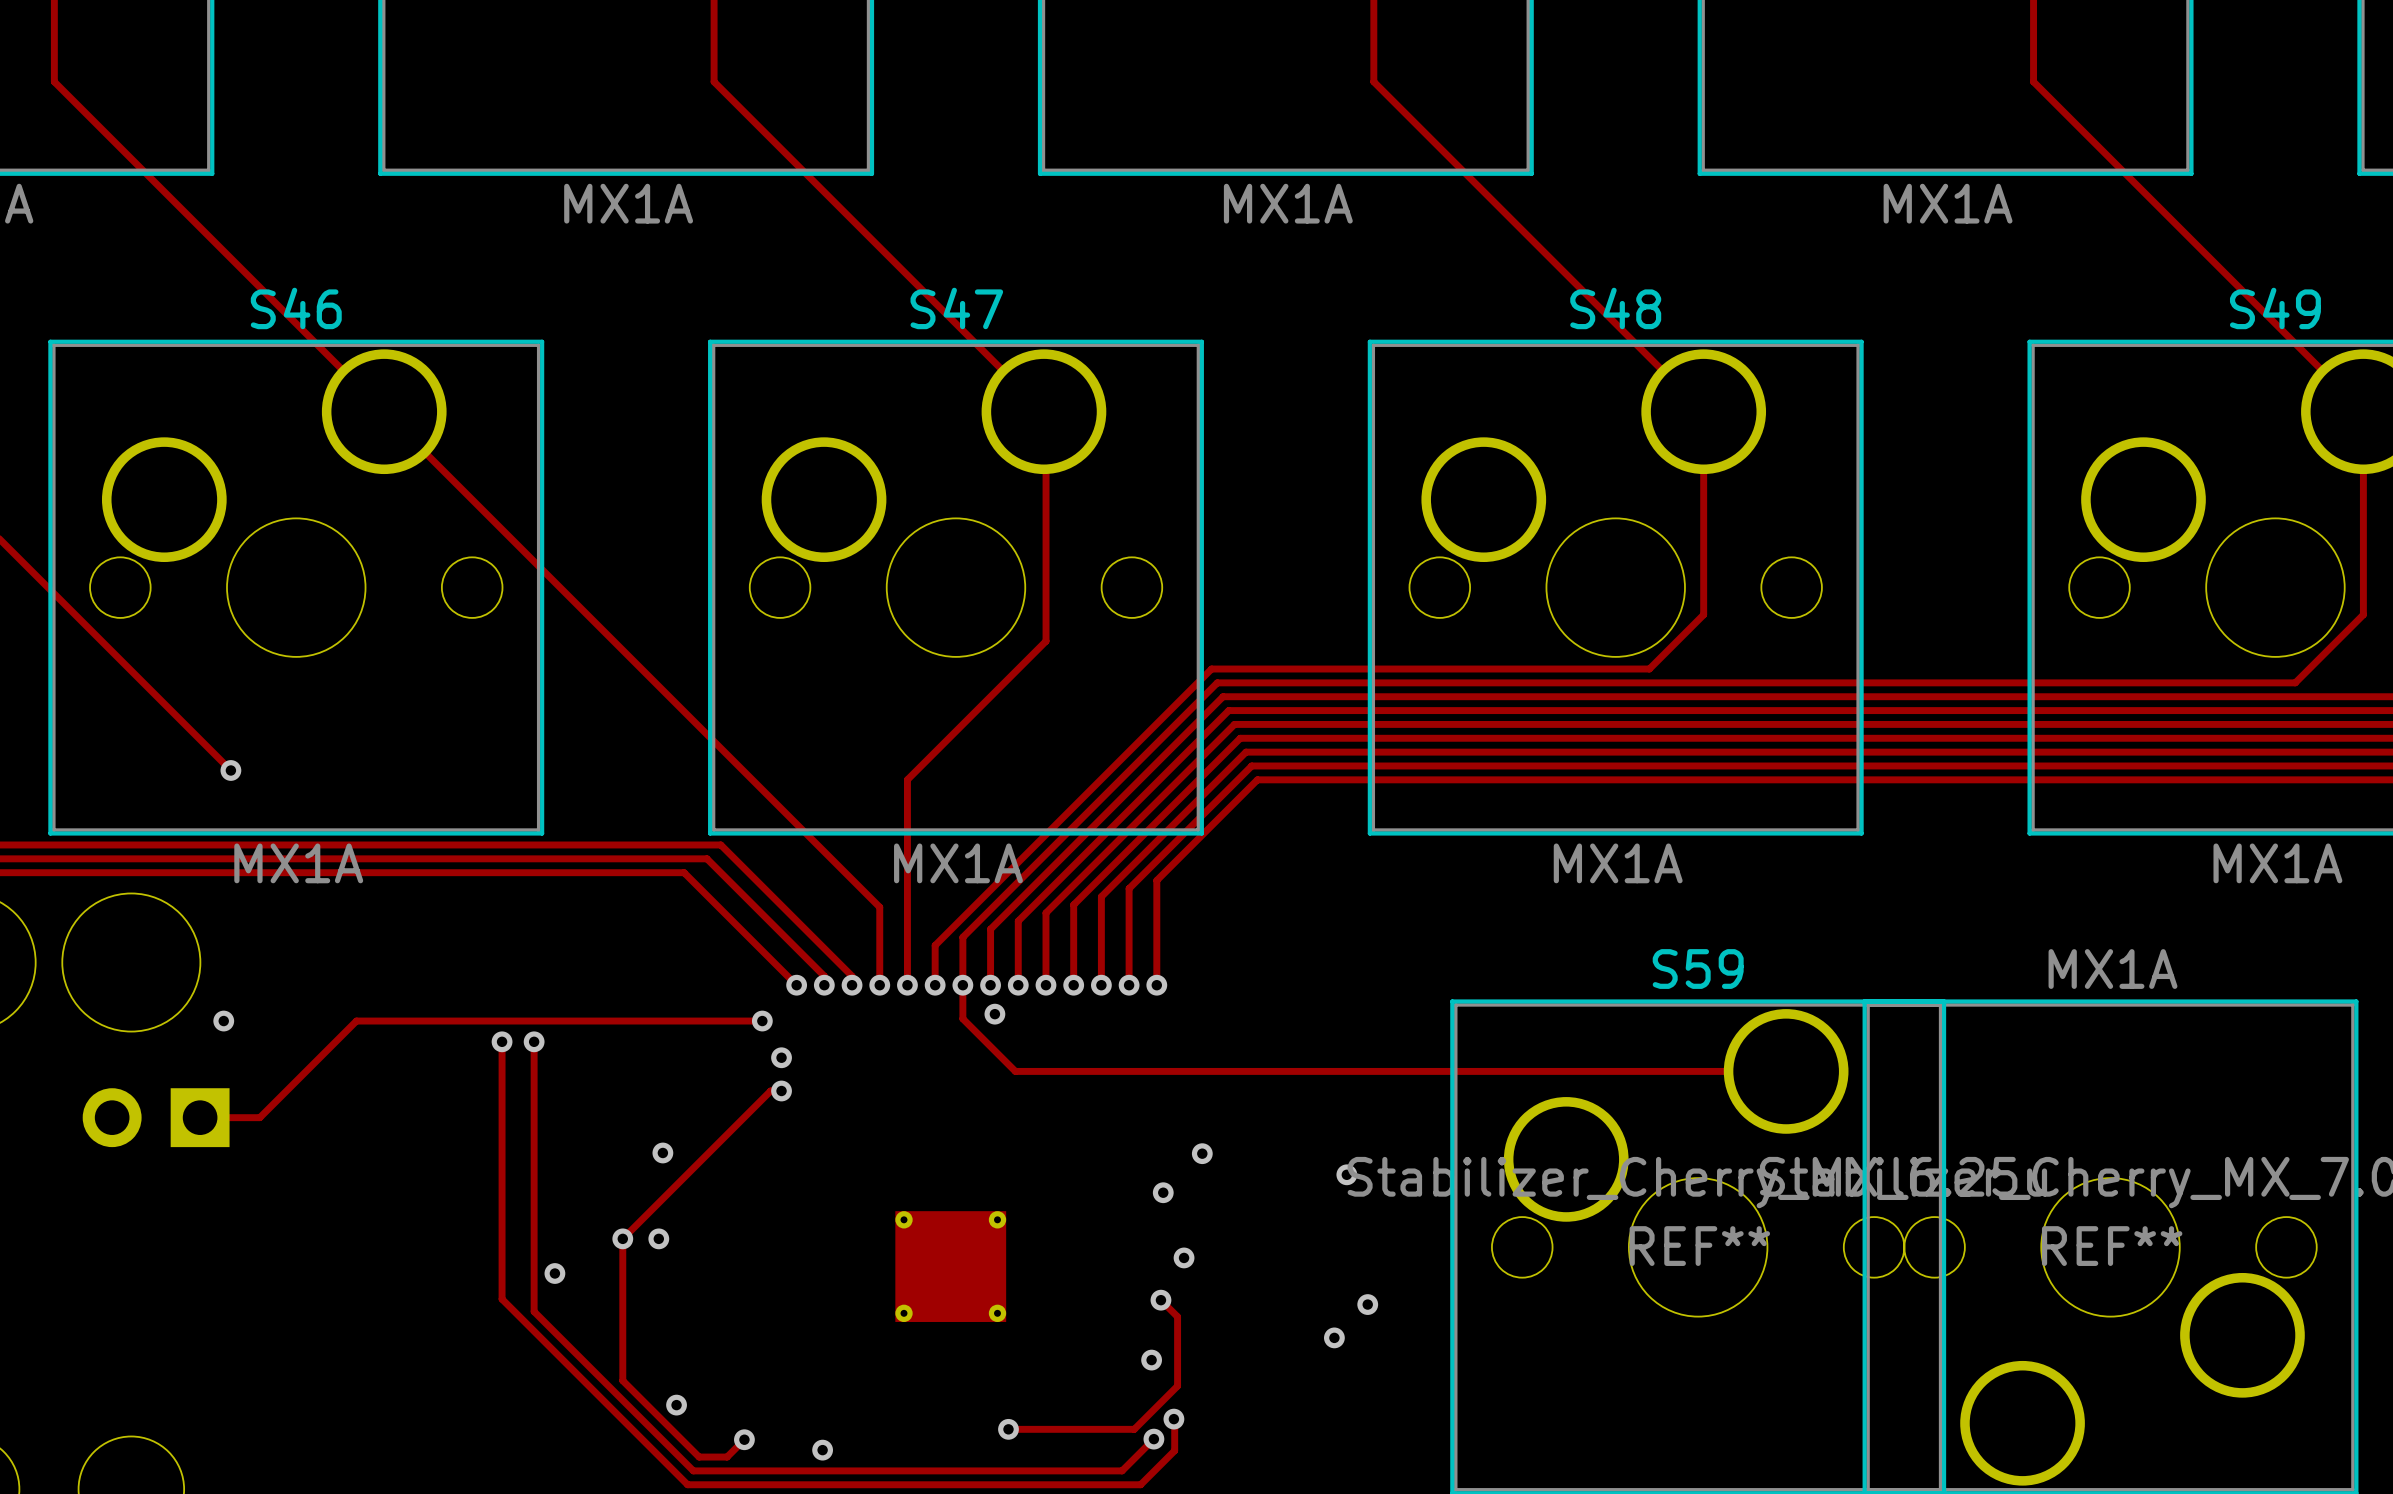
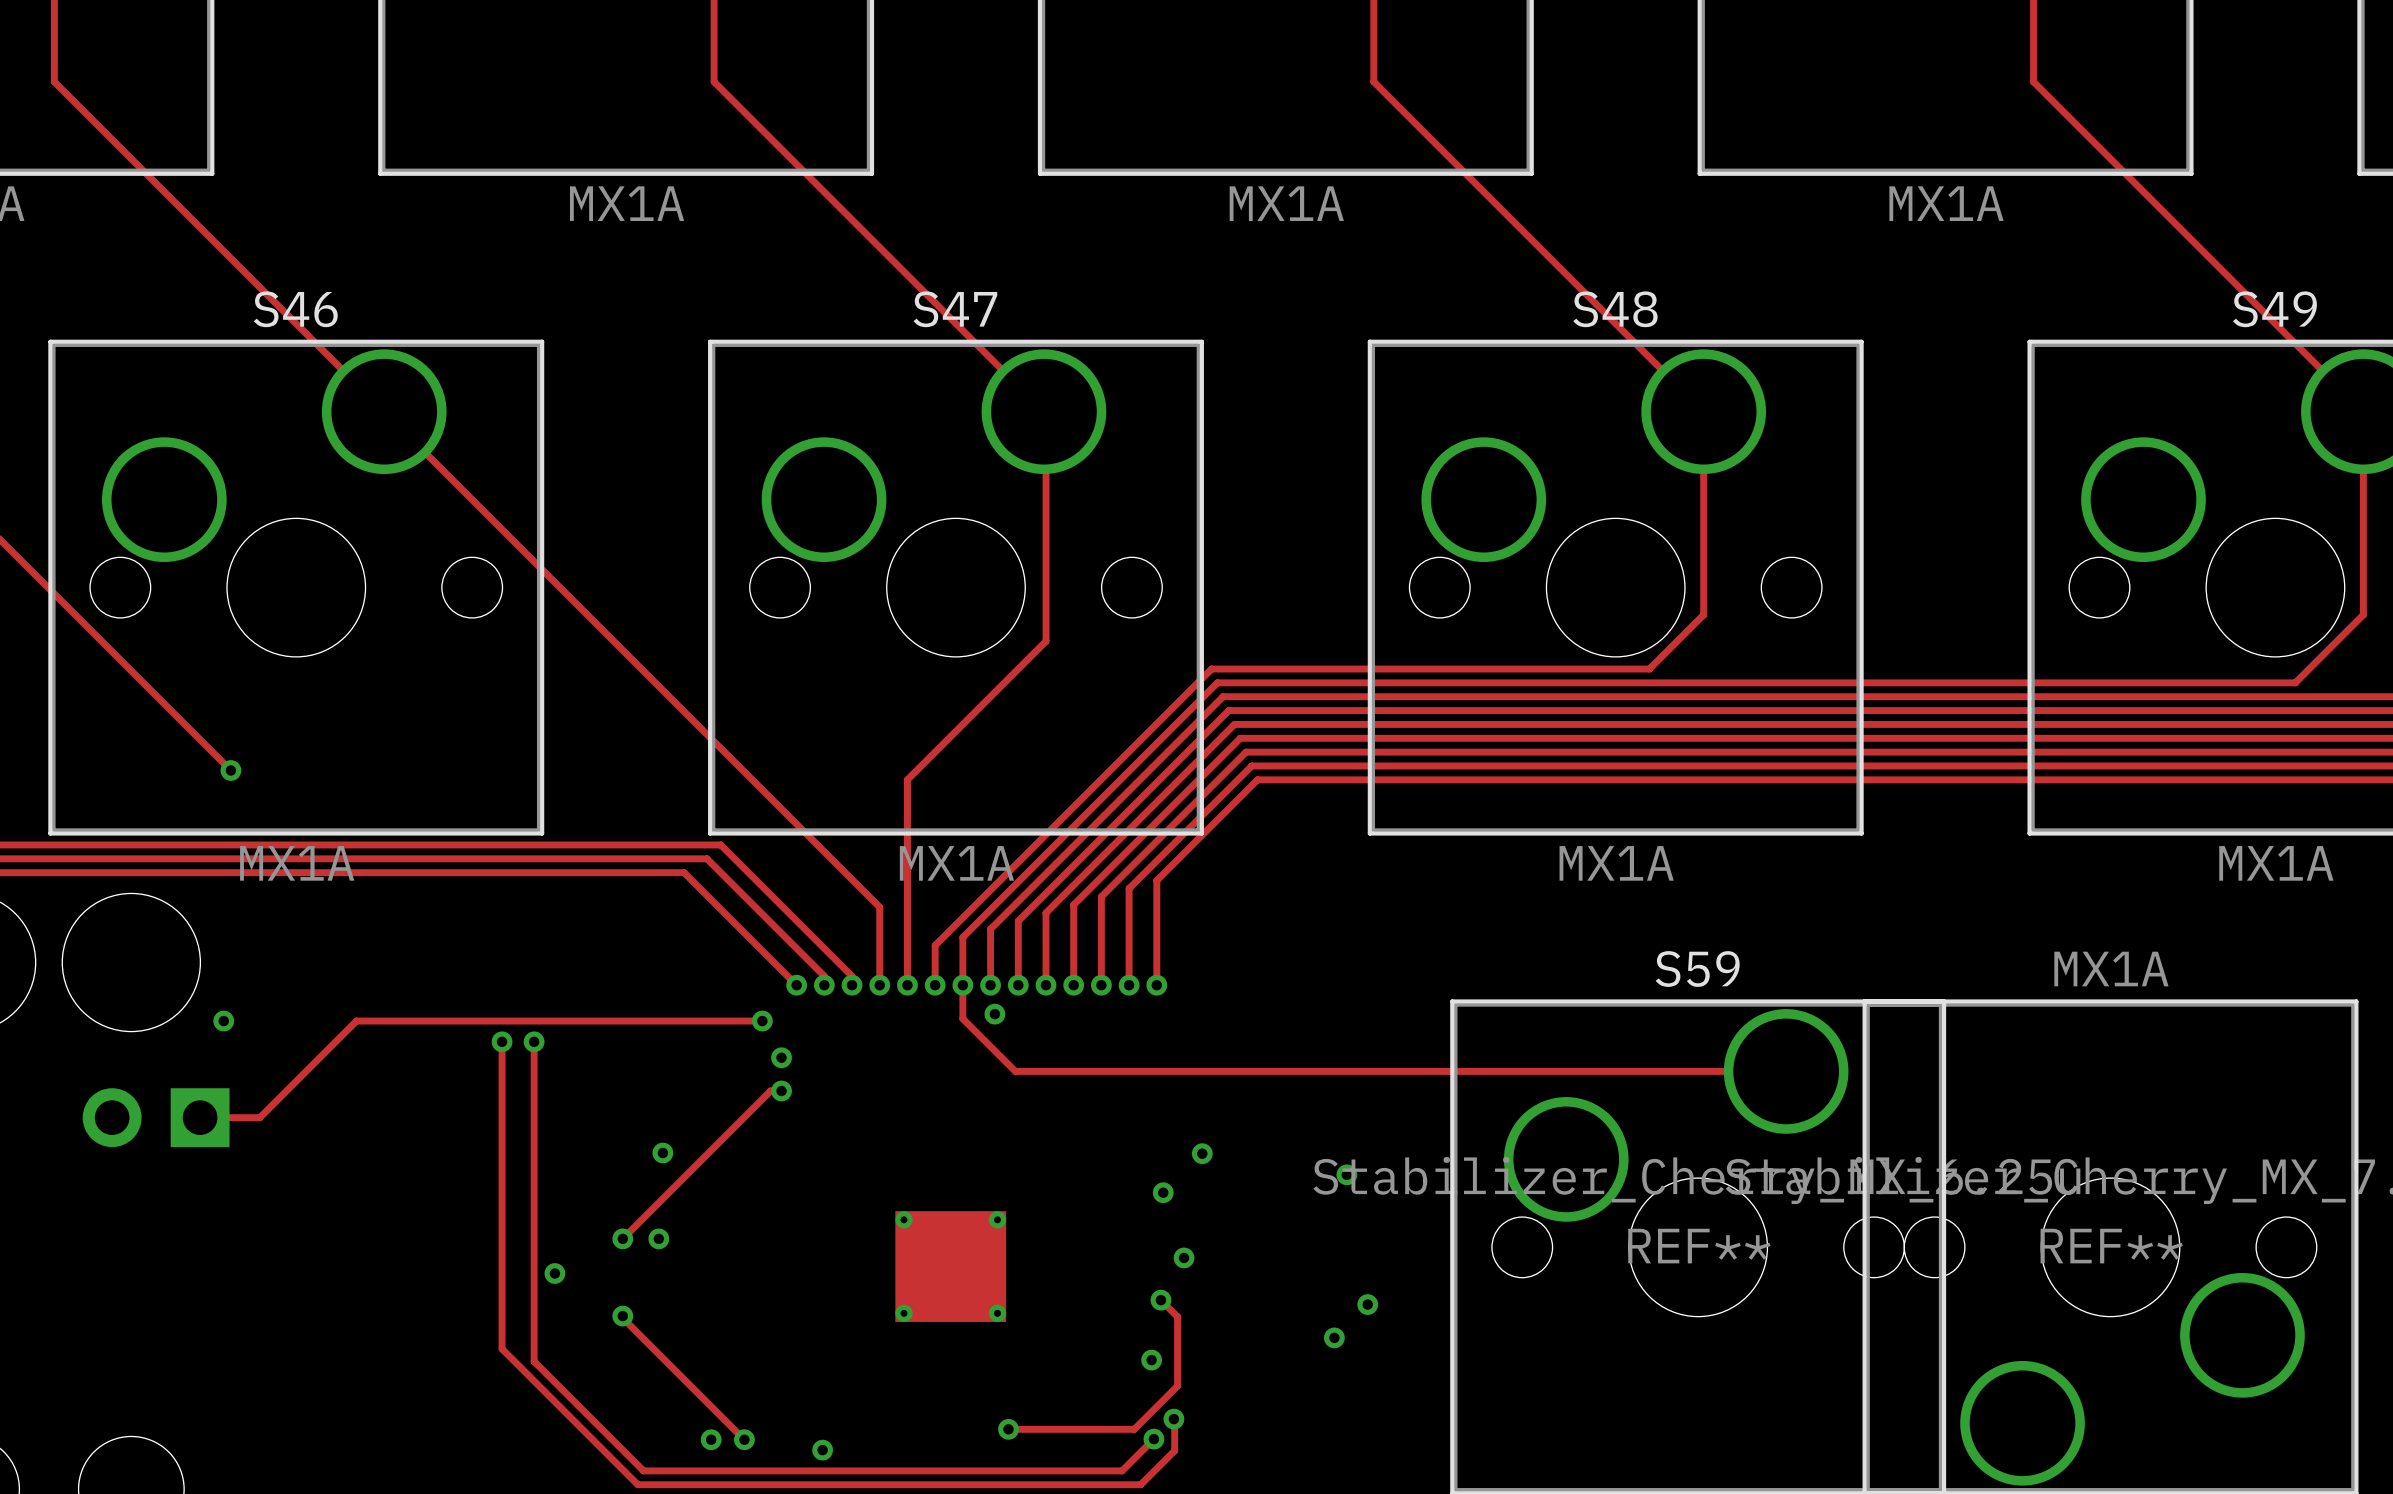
track: (622, 1238) (622, 1316) -> none
track: (502, 1299) (687, 1484) -> (502, 1299) (502, 1348) (637, 1484) (687, 1484)
track: (534, 1311) (693, 1470) -> (534, 1311) (534, 1361) (643, 1470) (693, 1470)
via: none -> (622, 1316)
track: (622, 1318) (622, 1380) (699, 1457) (727, 1457) (744, 1439) -> (622, 1318) (744, 1439)
via position: (676, 1405) -> (711, 1439)

